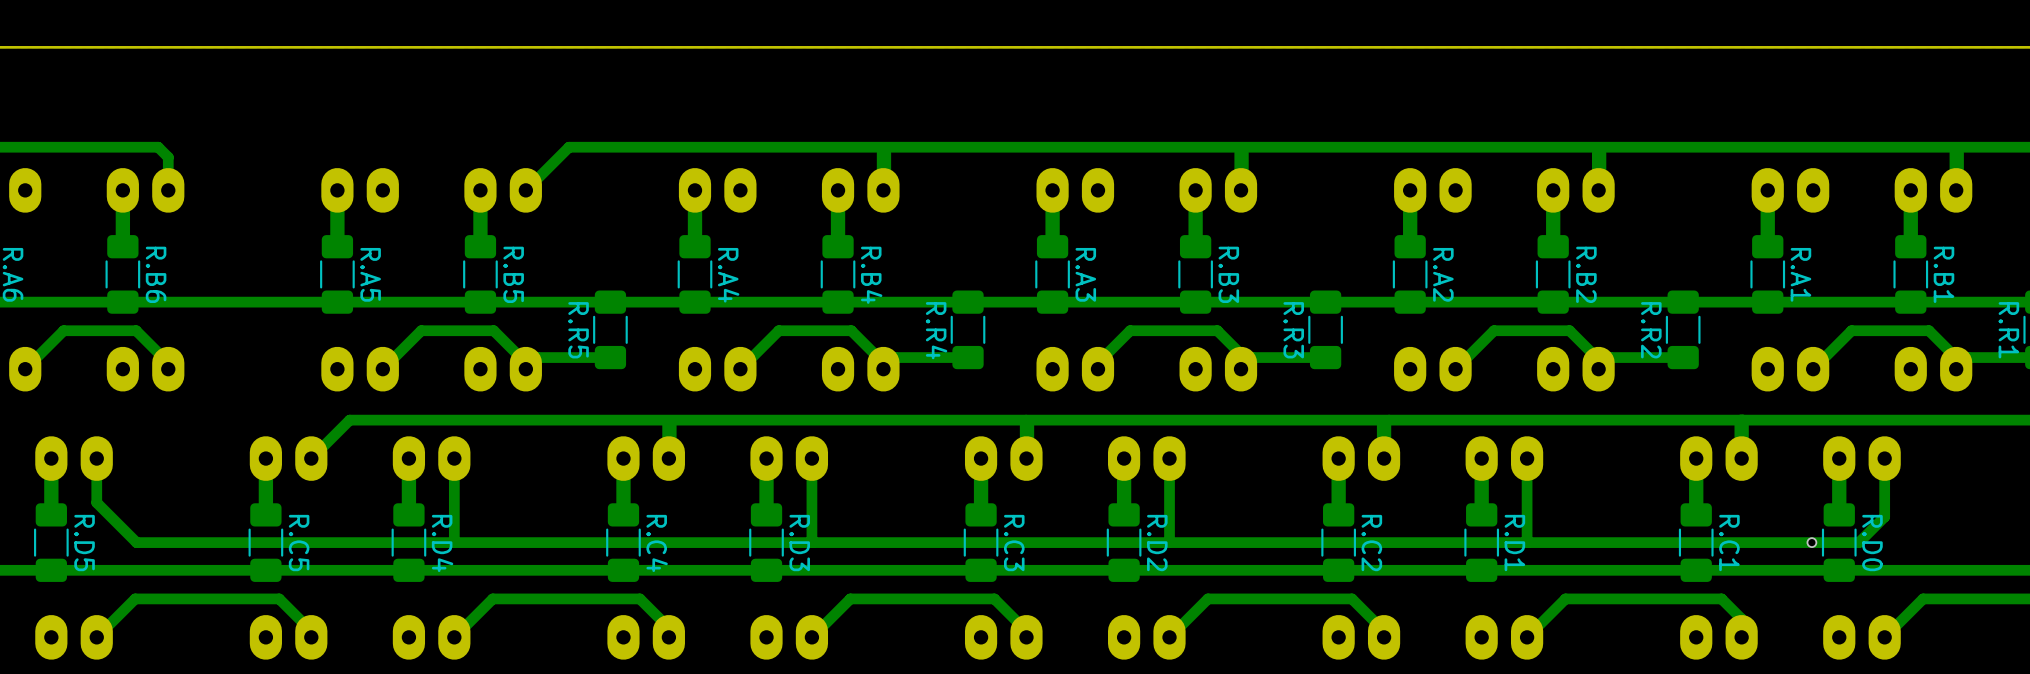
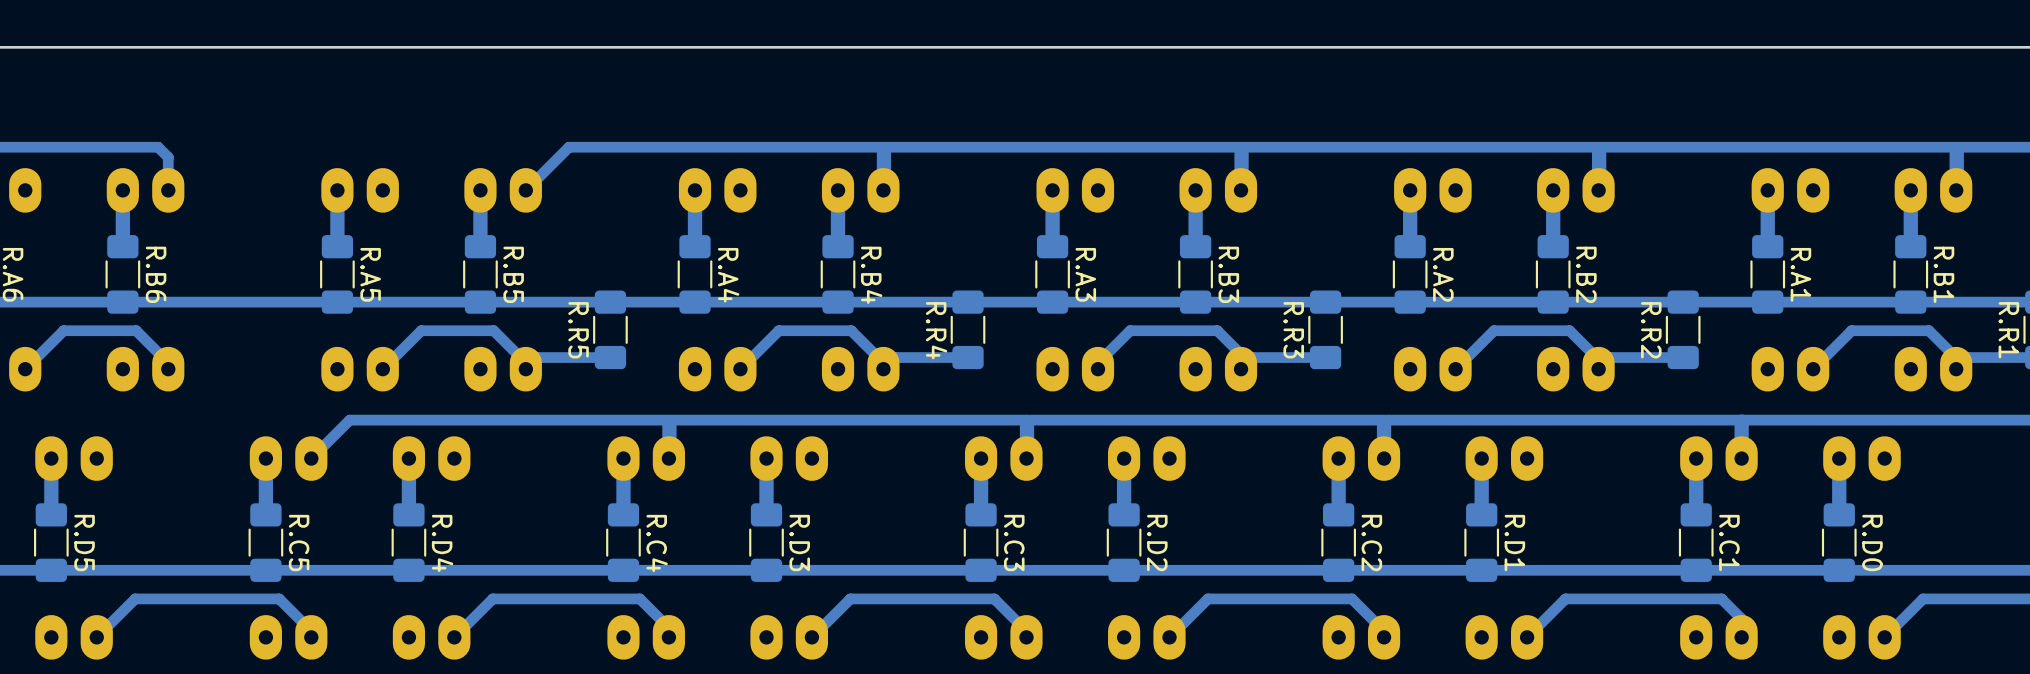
track: (454, 458) (453, 542) -> none
track: (811, 458) (812, 542) -> none
track: (1169, 458) (1168, 542) -> none
track: (1527, 458) (1527, 542) -> none
track: (1884, 458) (1884, 516) (1858, 542) (136, 542) (96, 502) (96, 458) -> none
via: (1811, 542) -> none

